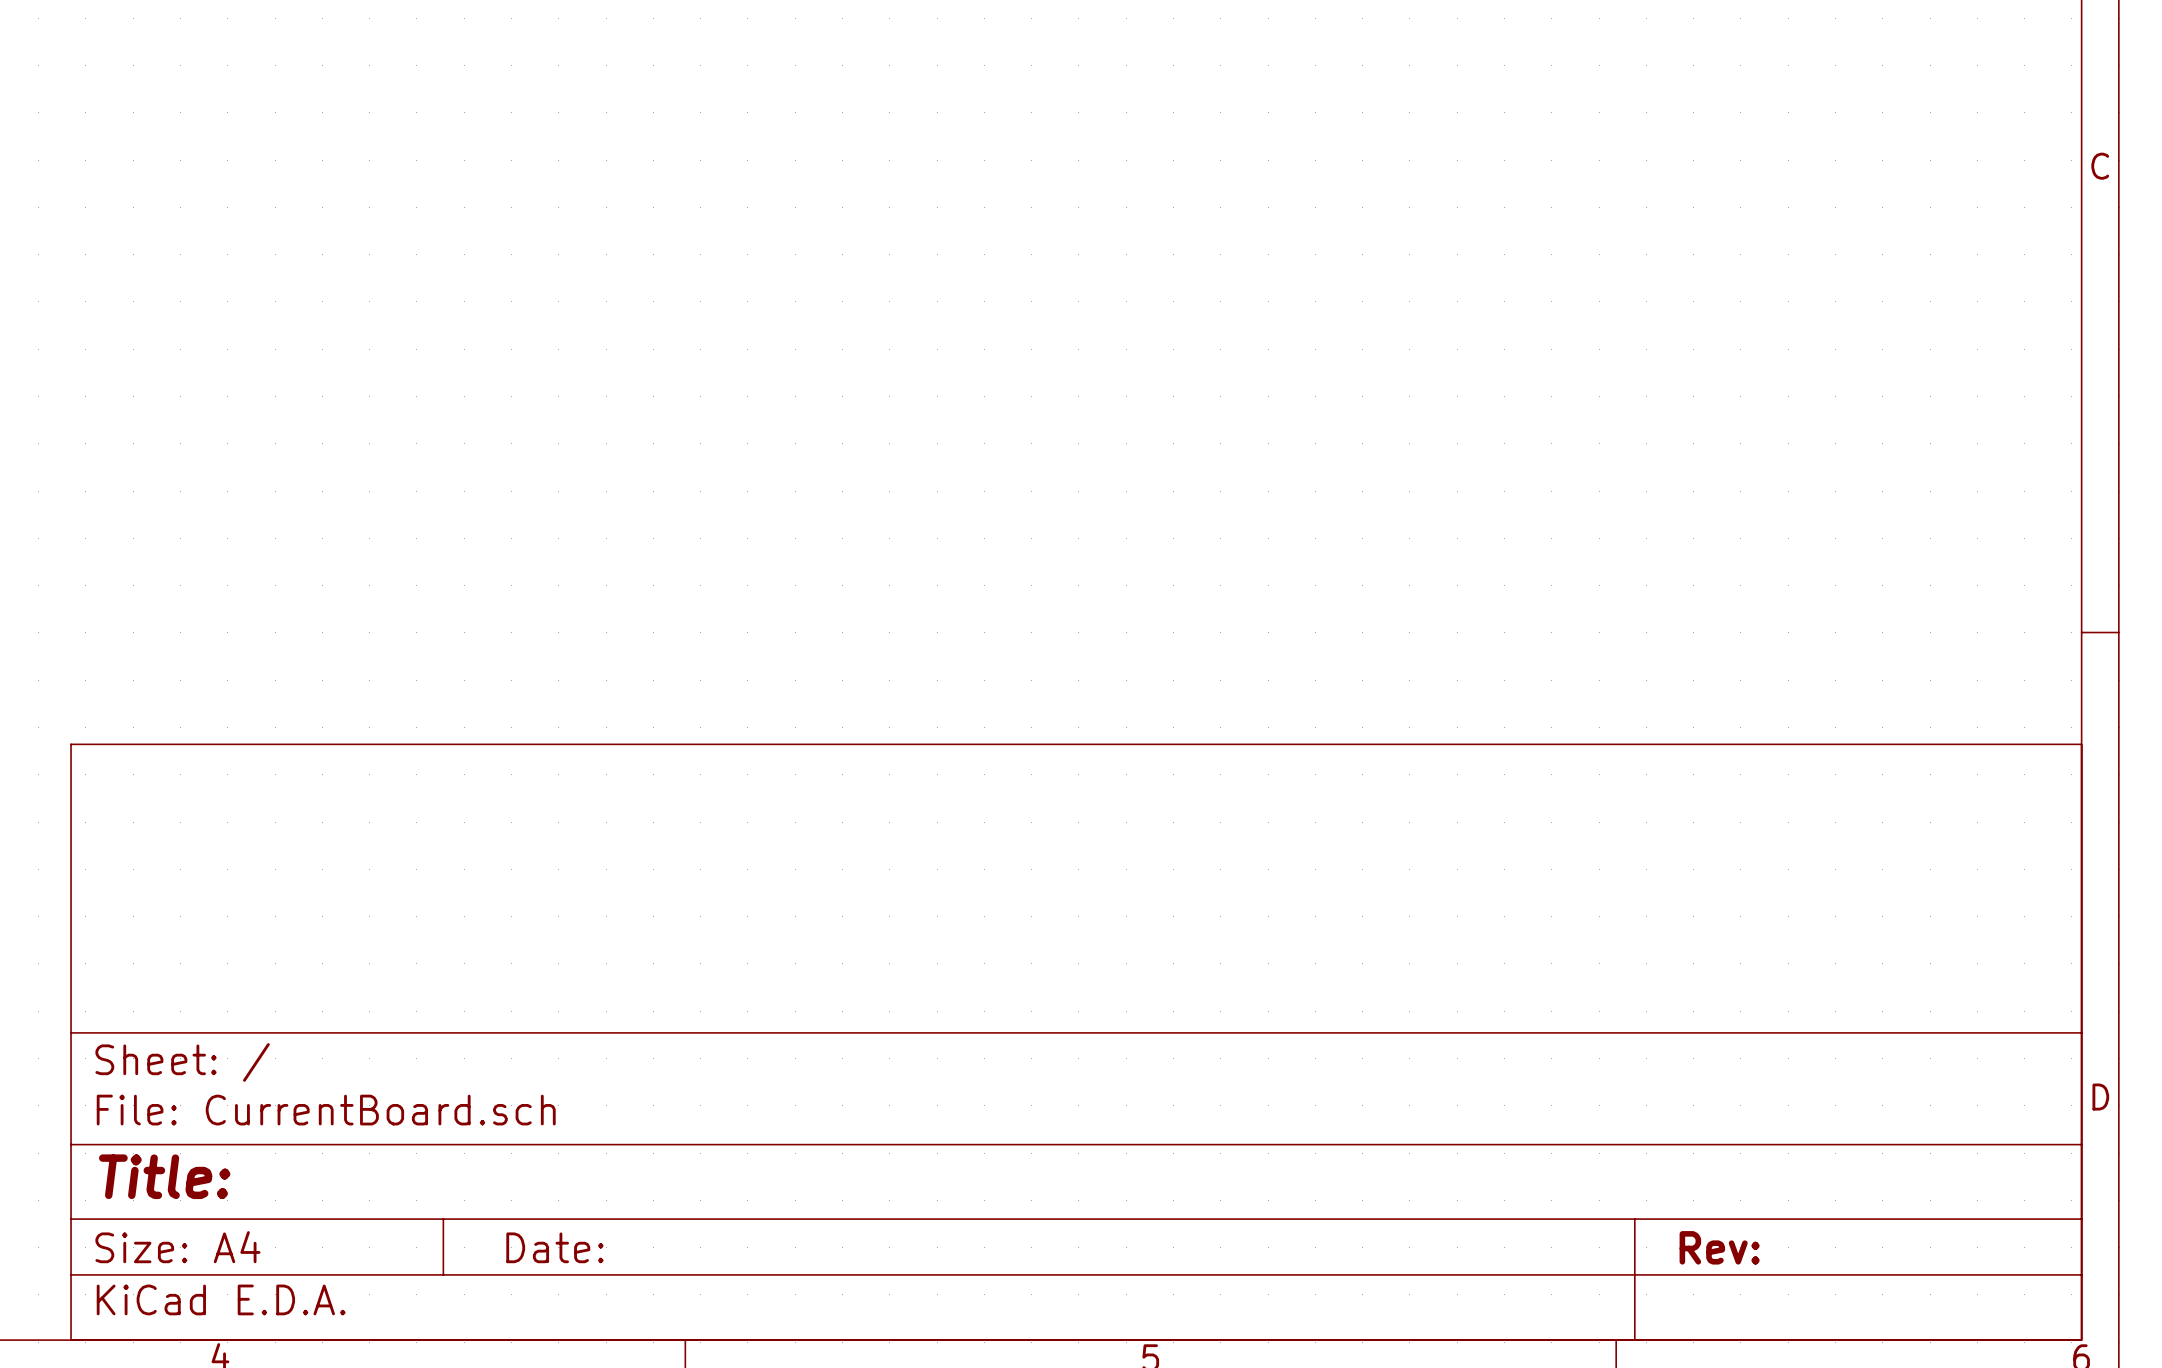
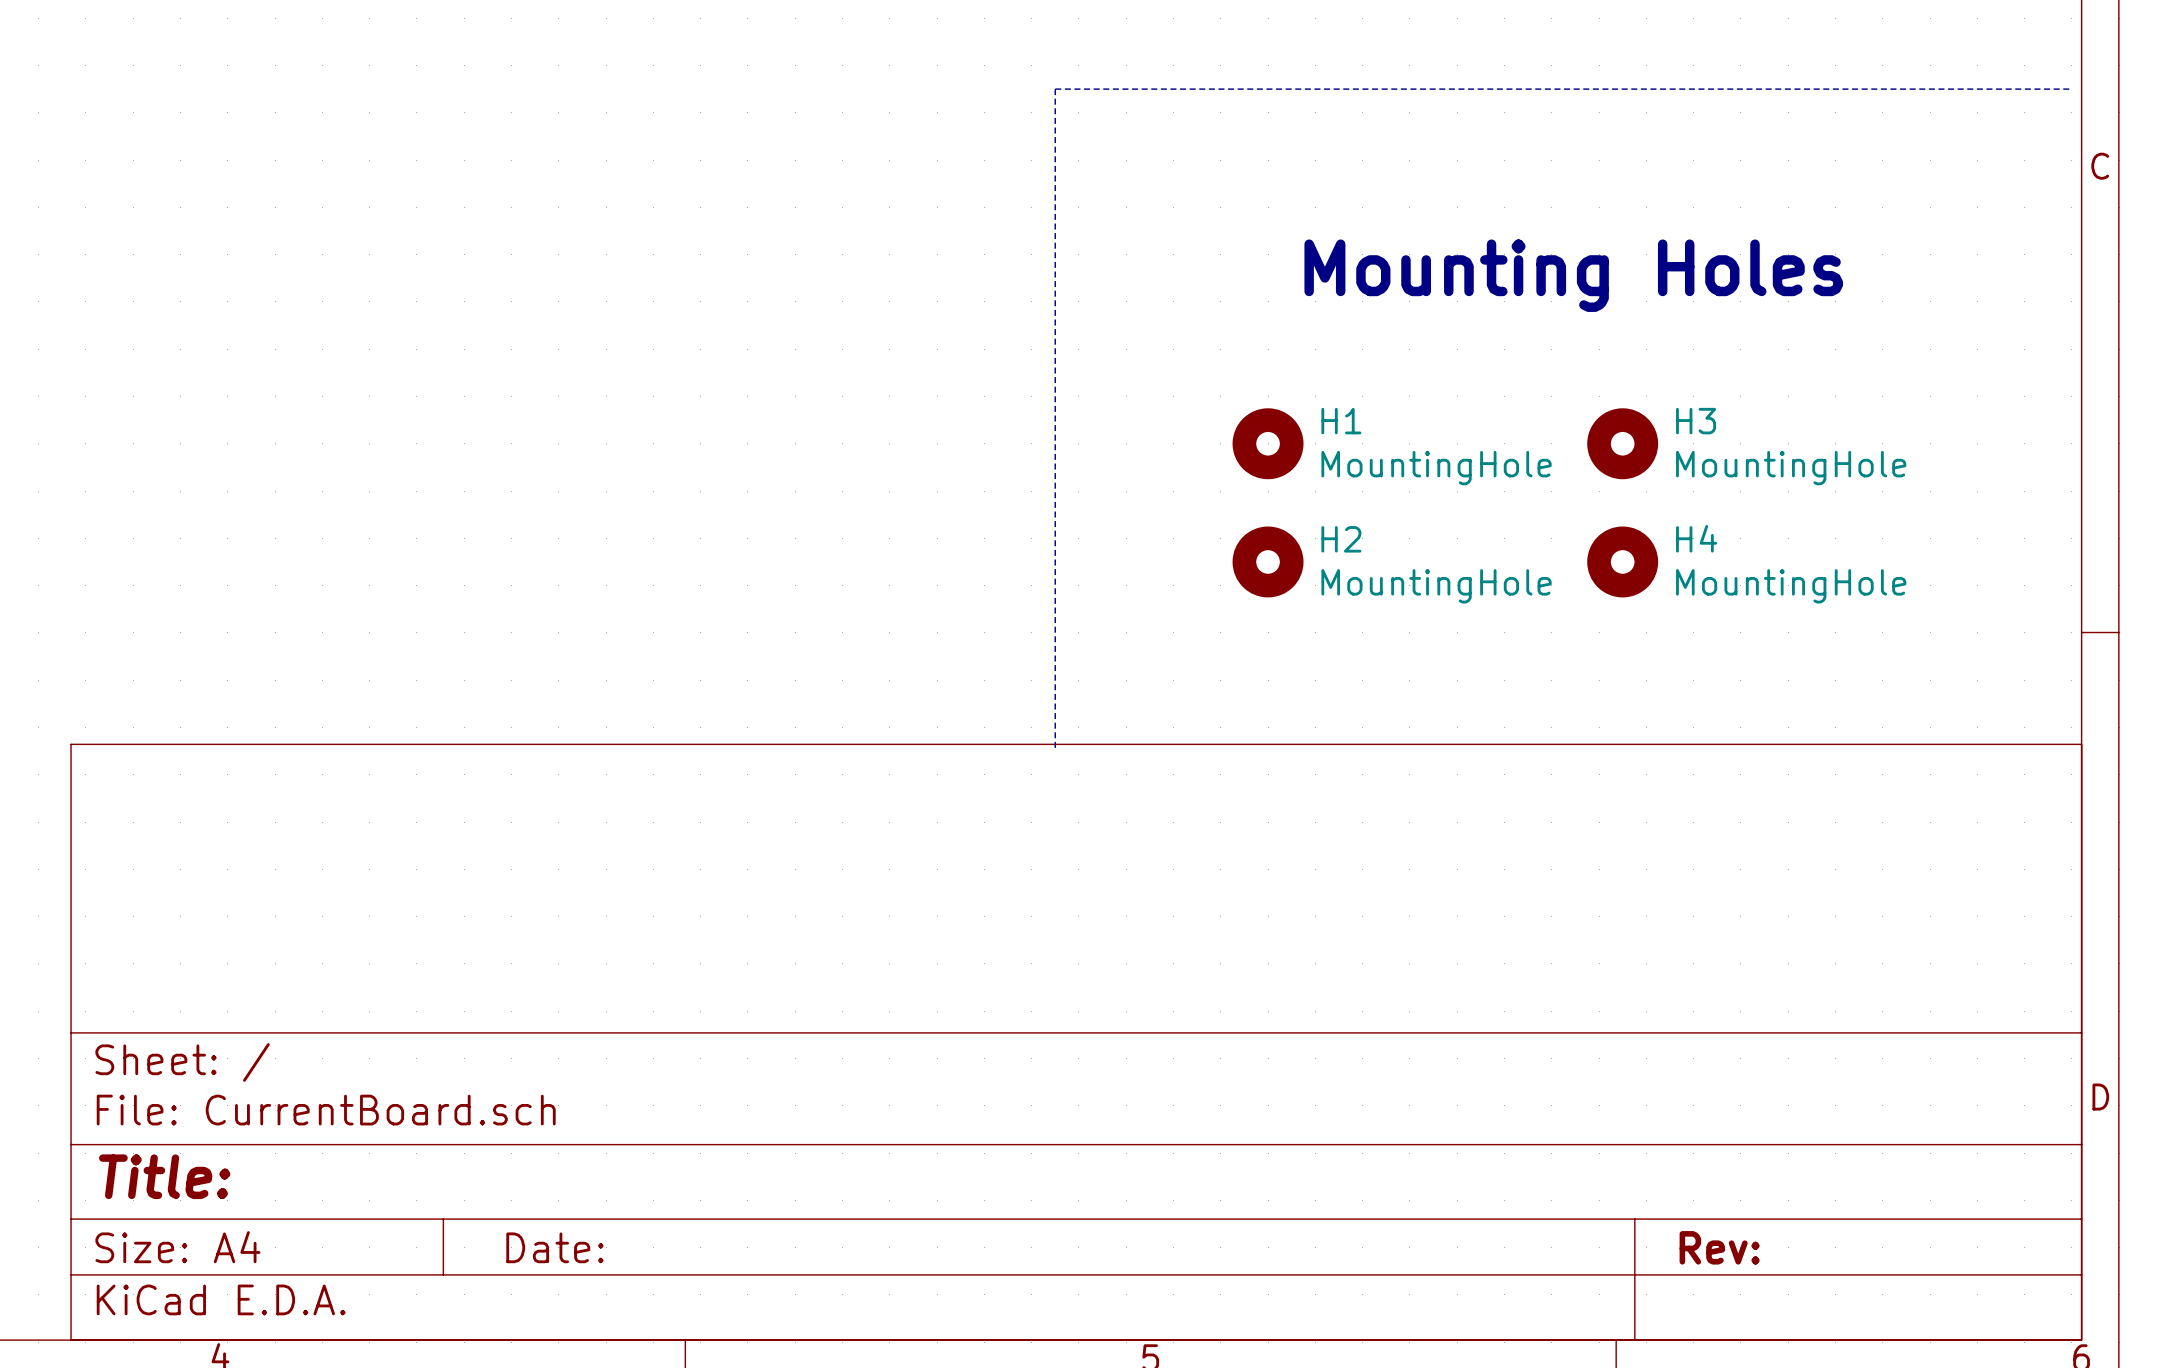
line: none -> (2071, 89) (1055, 89) (1055, 751)
text: none -> Mounting Holes (1573, 275)
H1: none -> MountingHole (1268, 443)
H3: none -> MountingHole (1622, 443)
H2: none -> MountingHole (1268, 561)
H4: none -> MountingHole (1622, 561)

